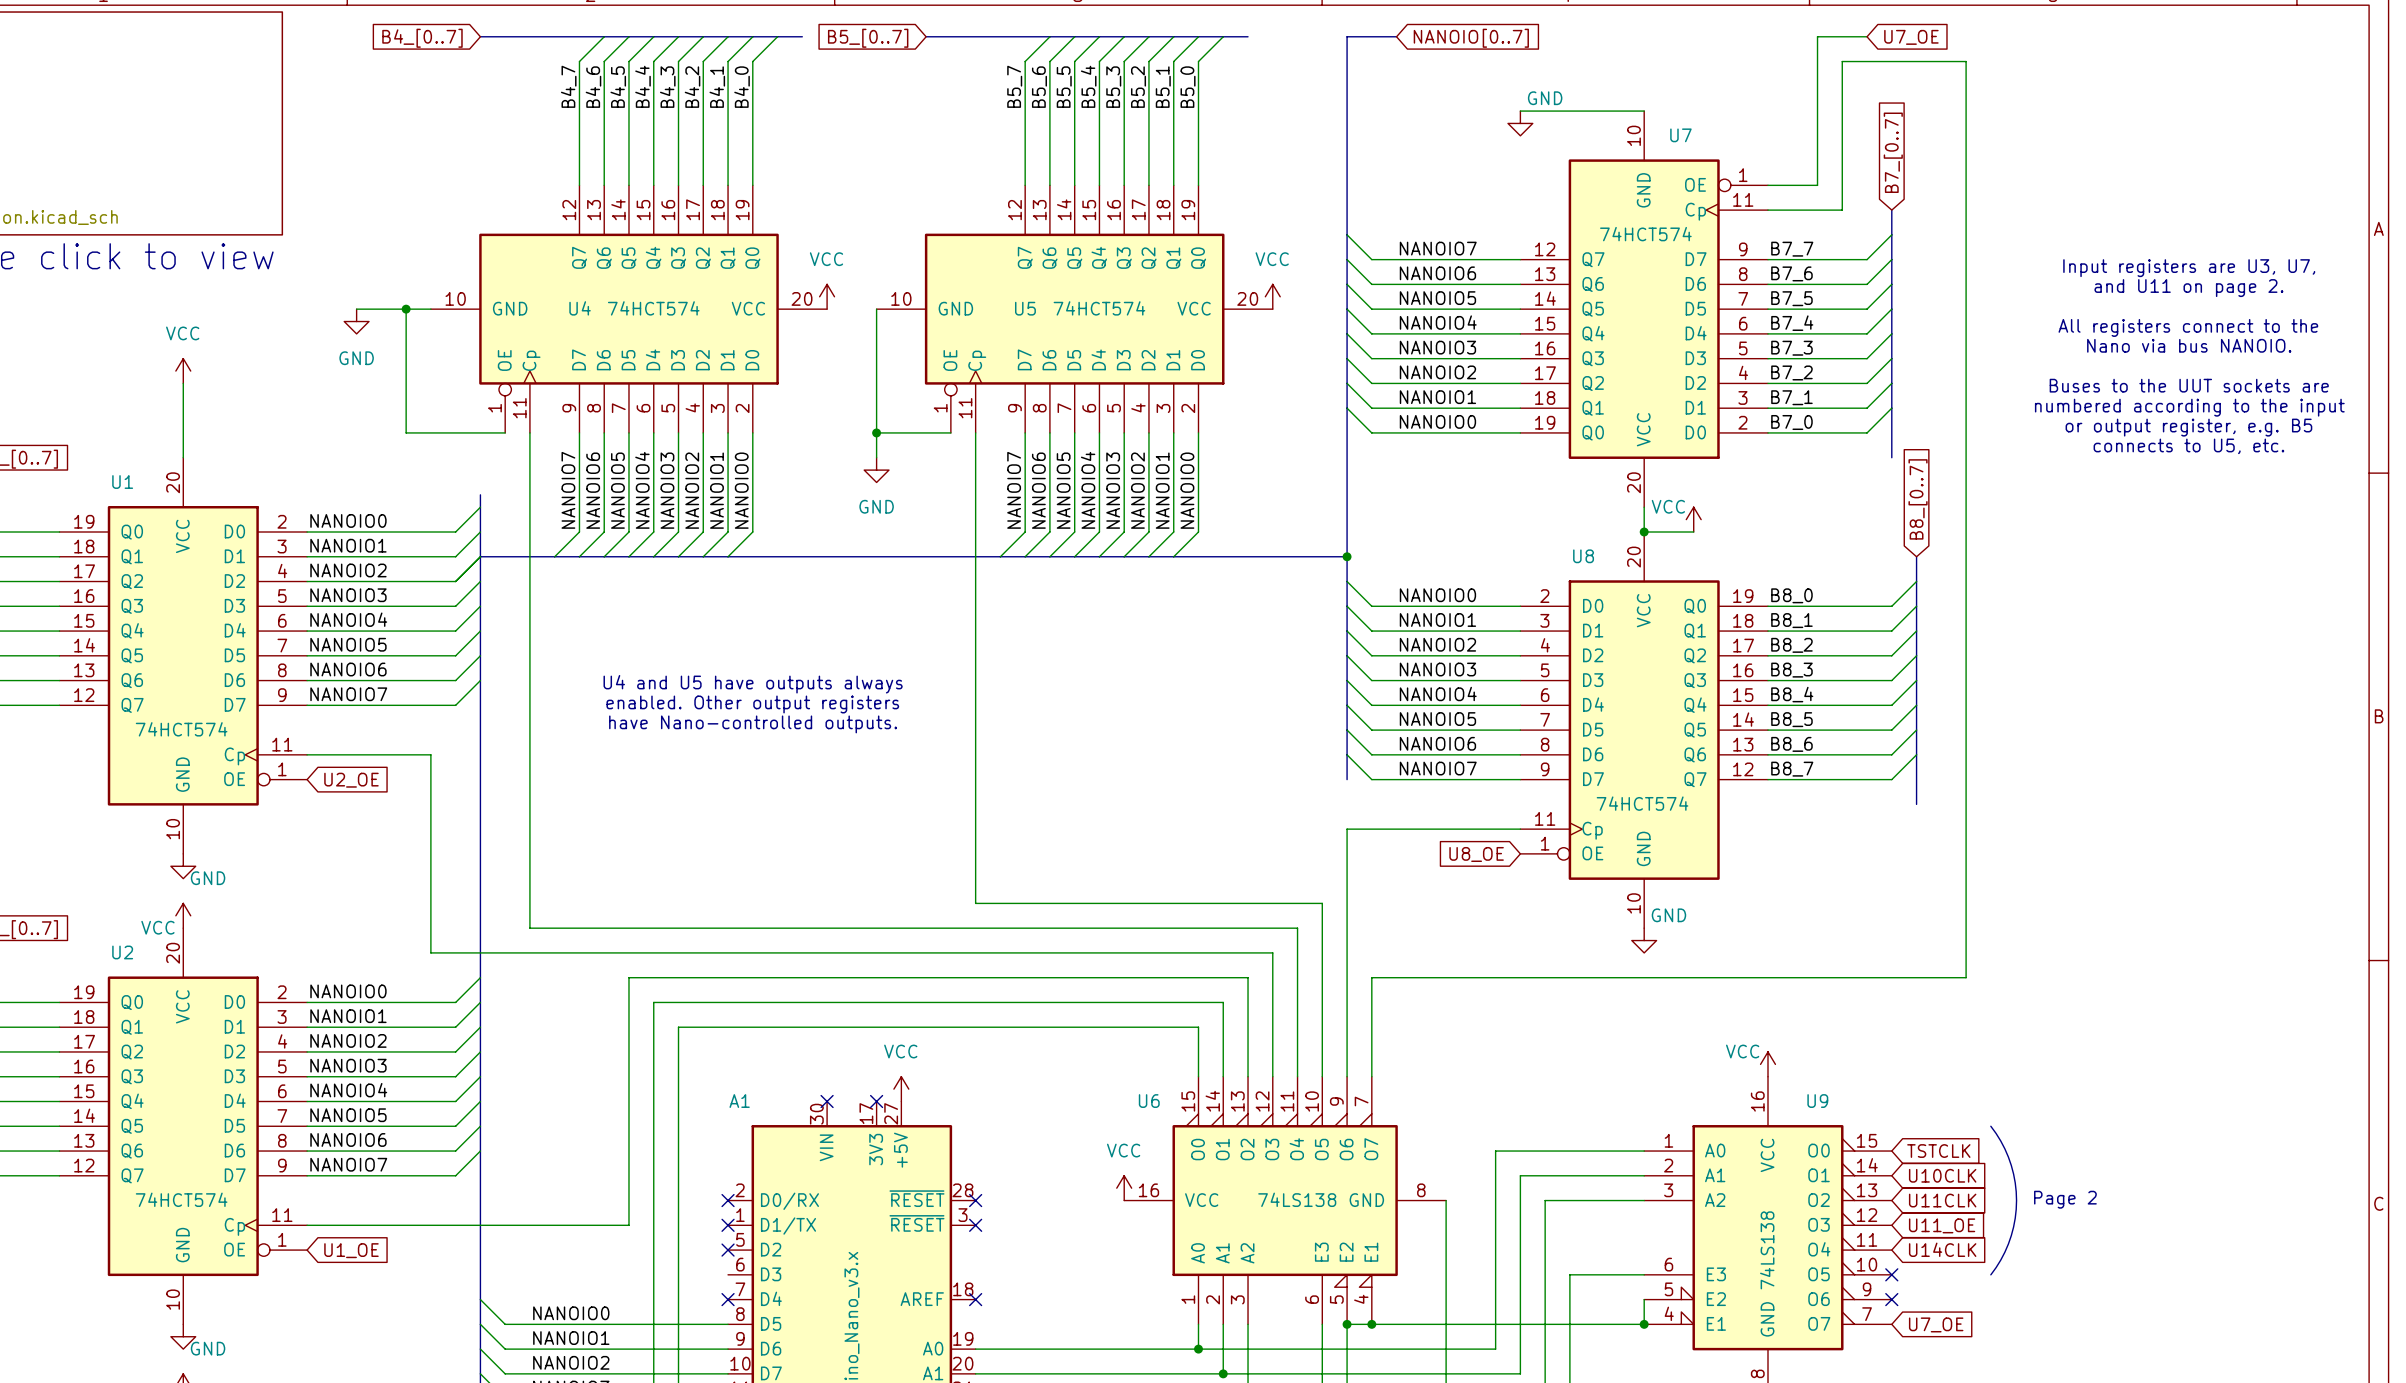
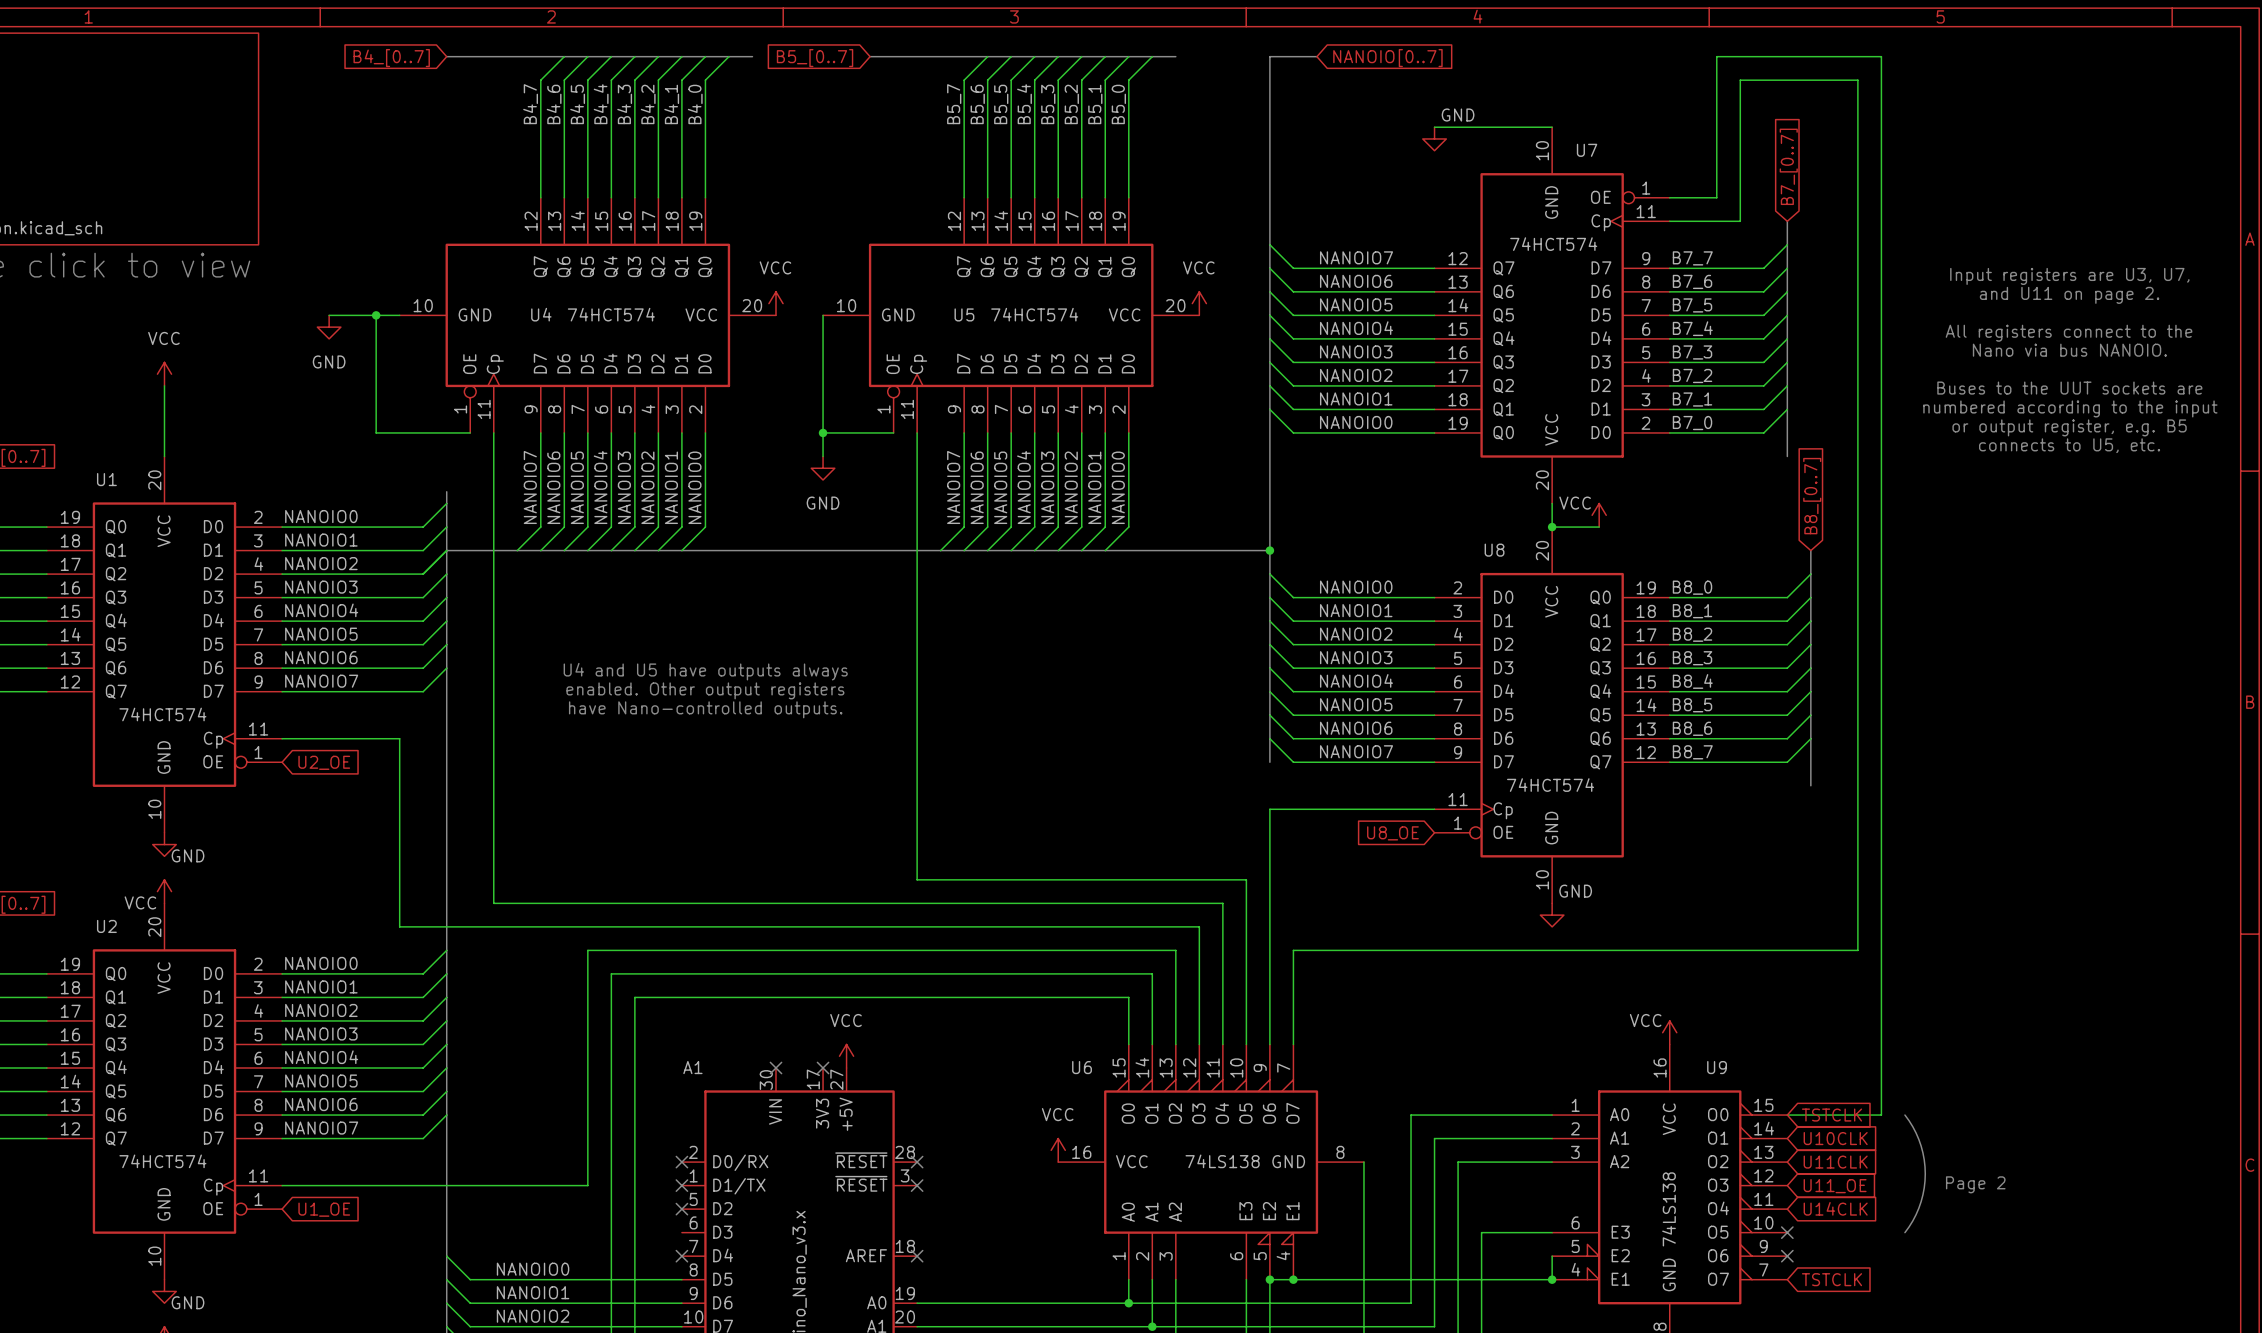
wire: none -> (1763, 56) (1881, 56) (1881, 1115) (1787, 1115)
global label: U7_OE (1911, 37) -> none
line: (1990, 1126) (2004, 1148) (2011, 1165) (2016, 1200) (2011, 1235) (2004, 1252) (1990, 1274) -> none
line: none -> (1904, 1115) (1918, 1139) (1924, 1159) (1925, 1173) (1924, 1187) (1918, 1208) (1904, 1232)
text position: Page 2 (2065, 1199) -> Page 2 (1975, 1184)
global label: U7_OE (1936, 1324) -> TSTCLK (1832, 1279)

